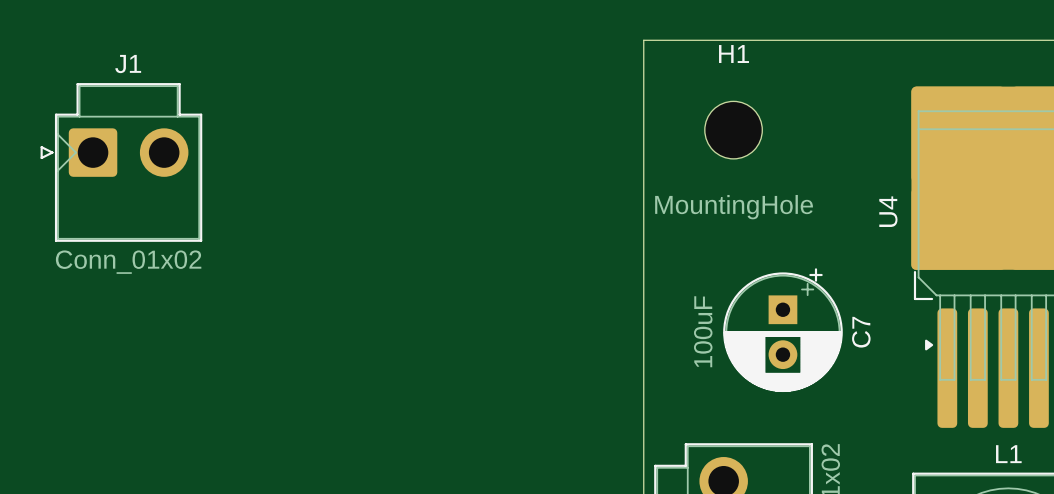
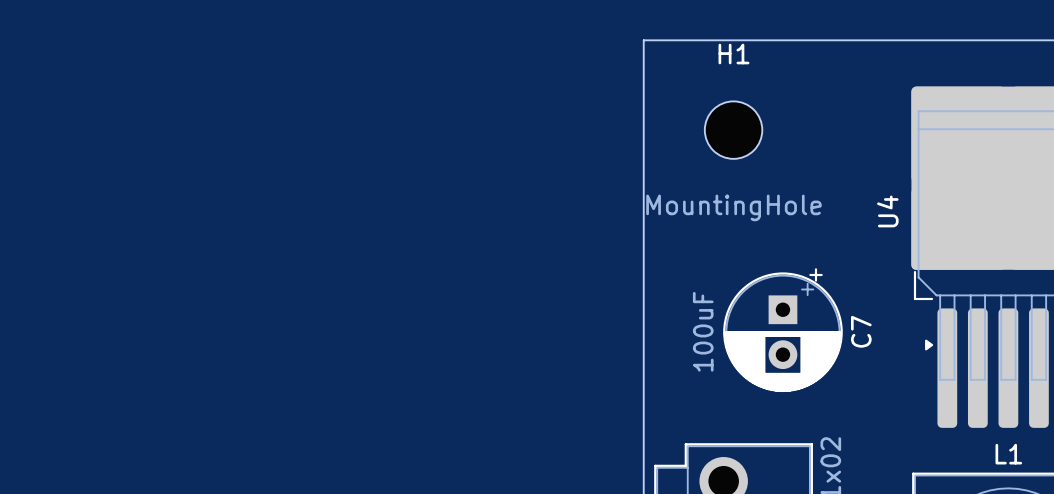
J1: Conn_01x02 (121, 162) -> none

